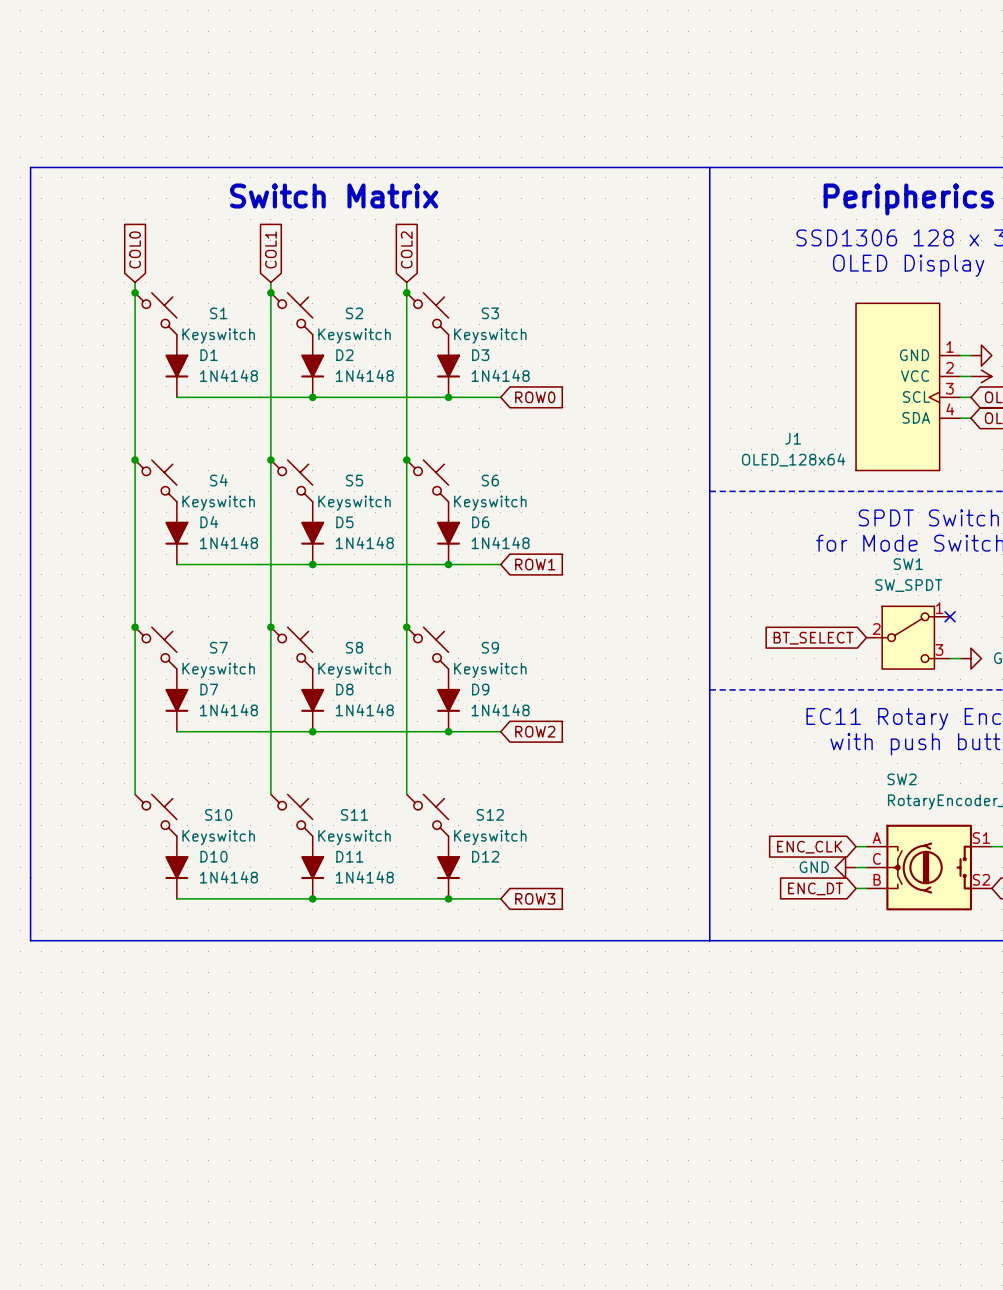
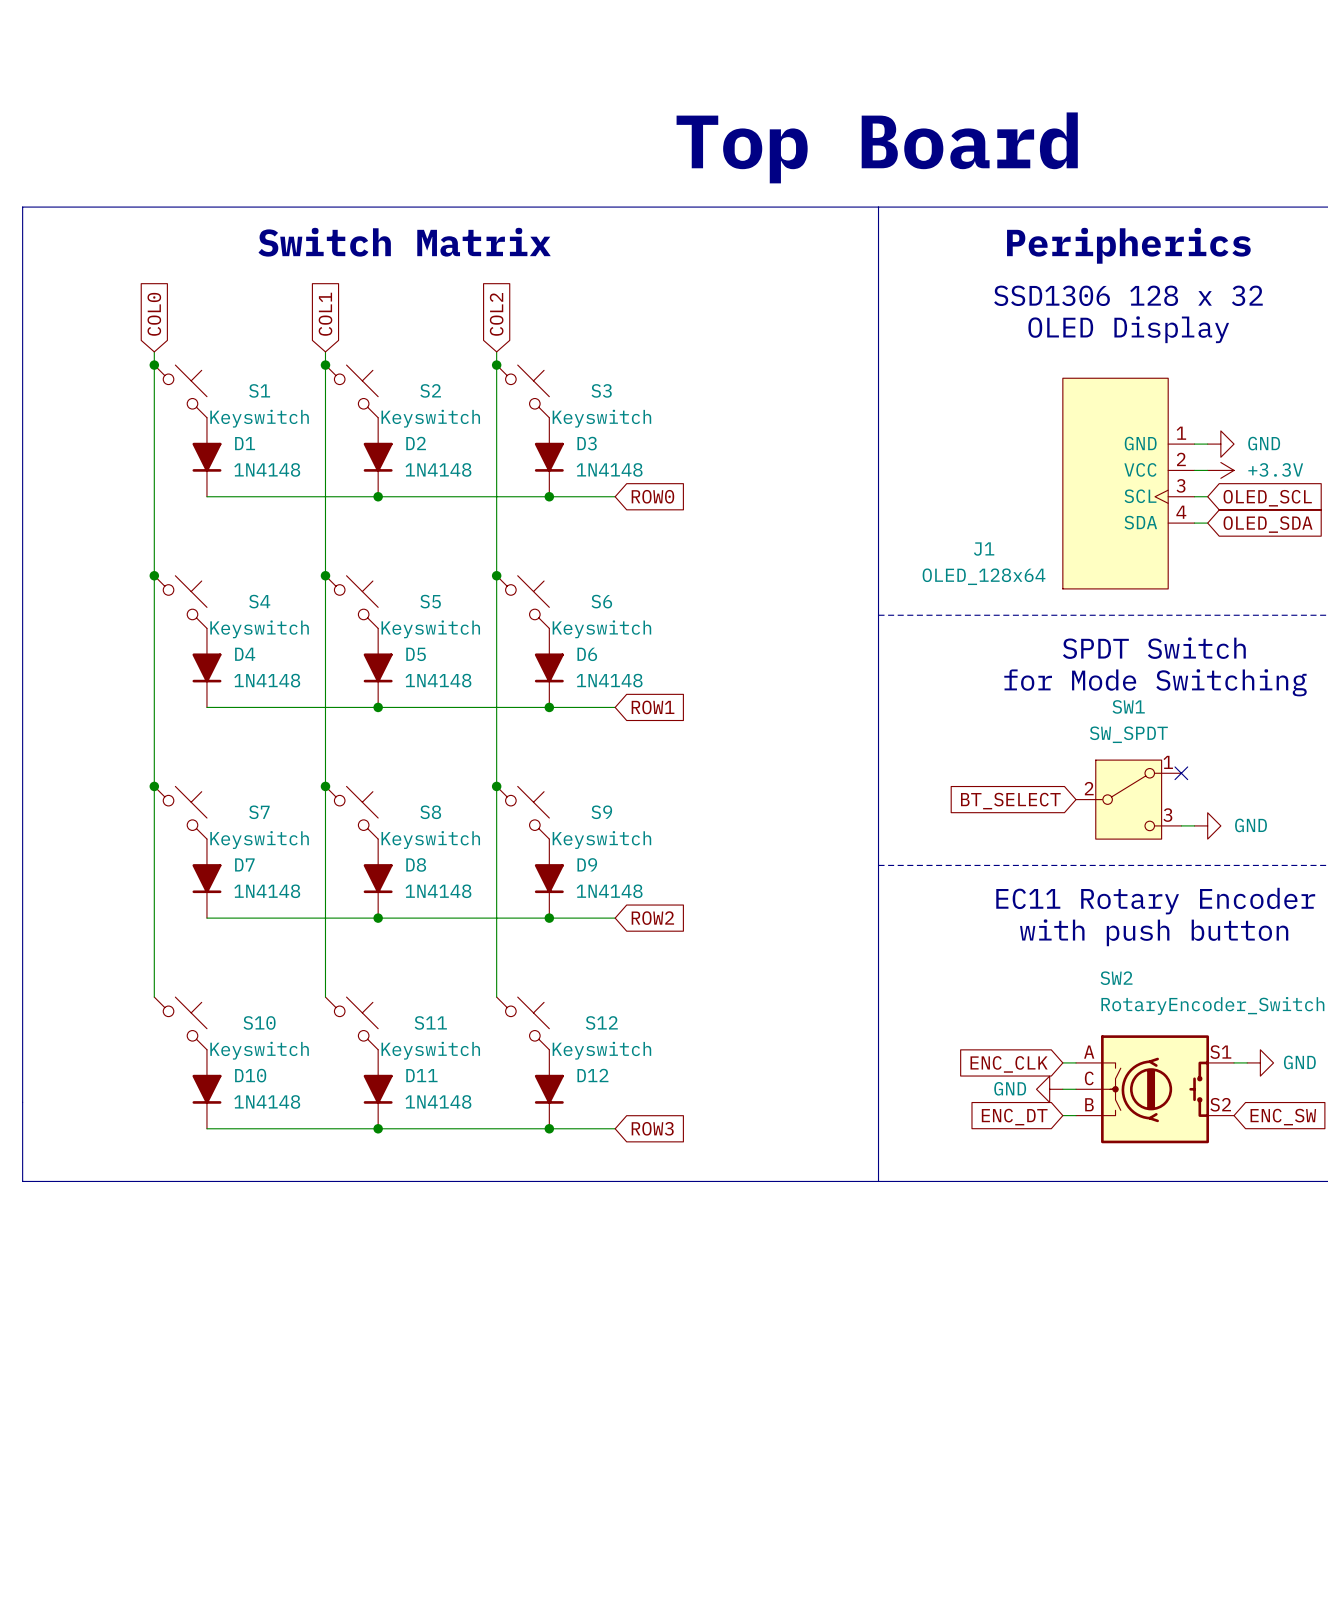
text: none -> Top Board (877, 147)

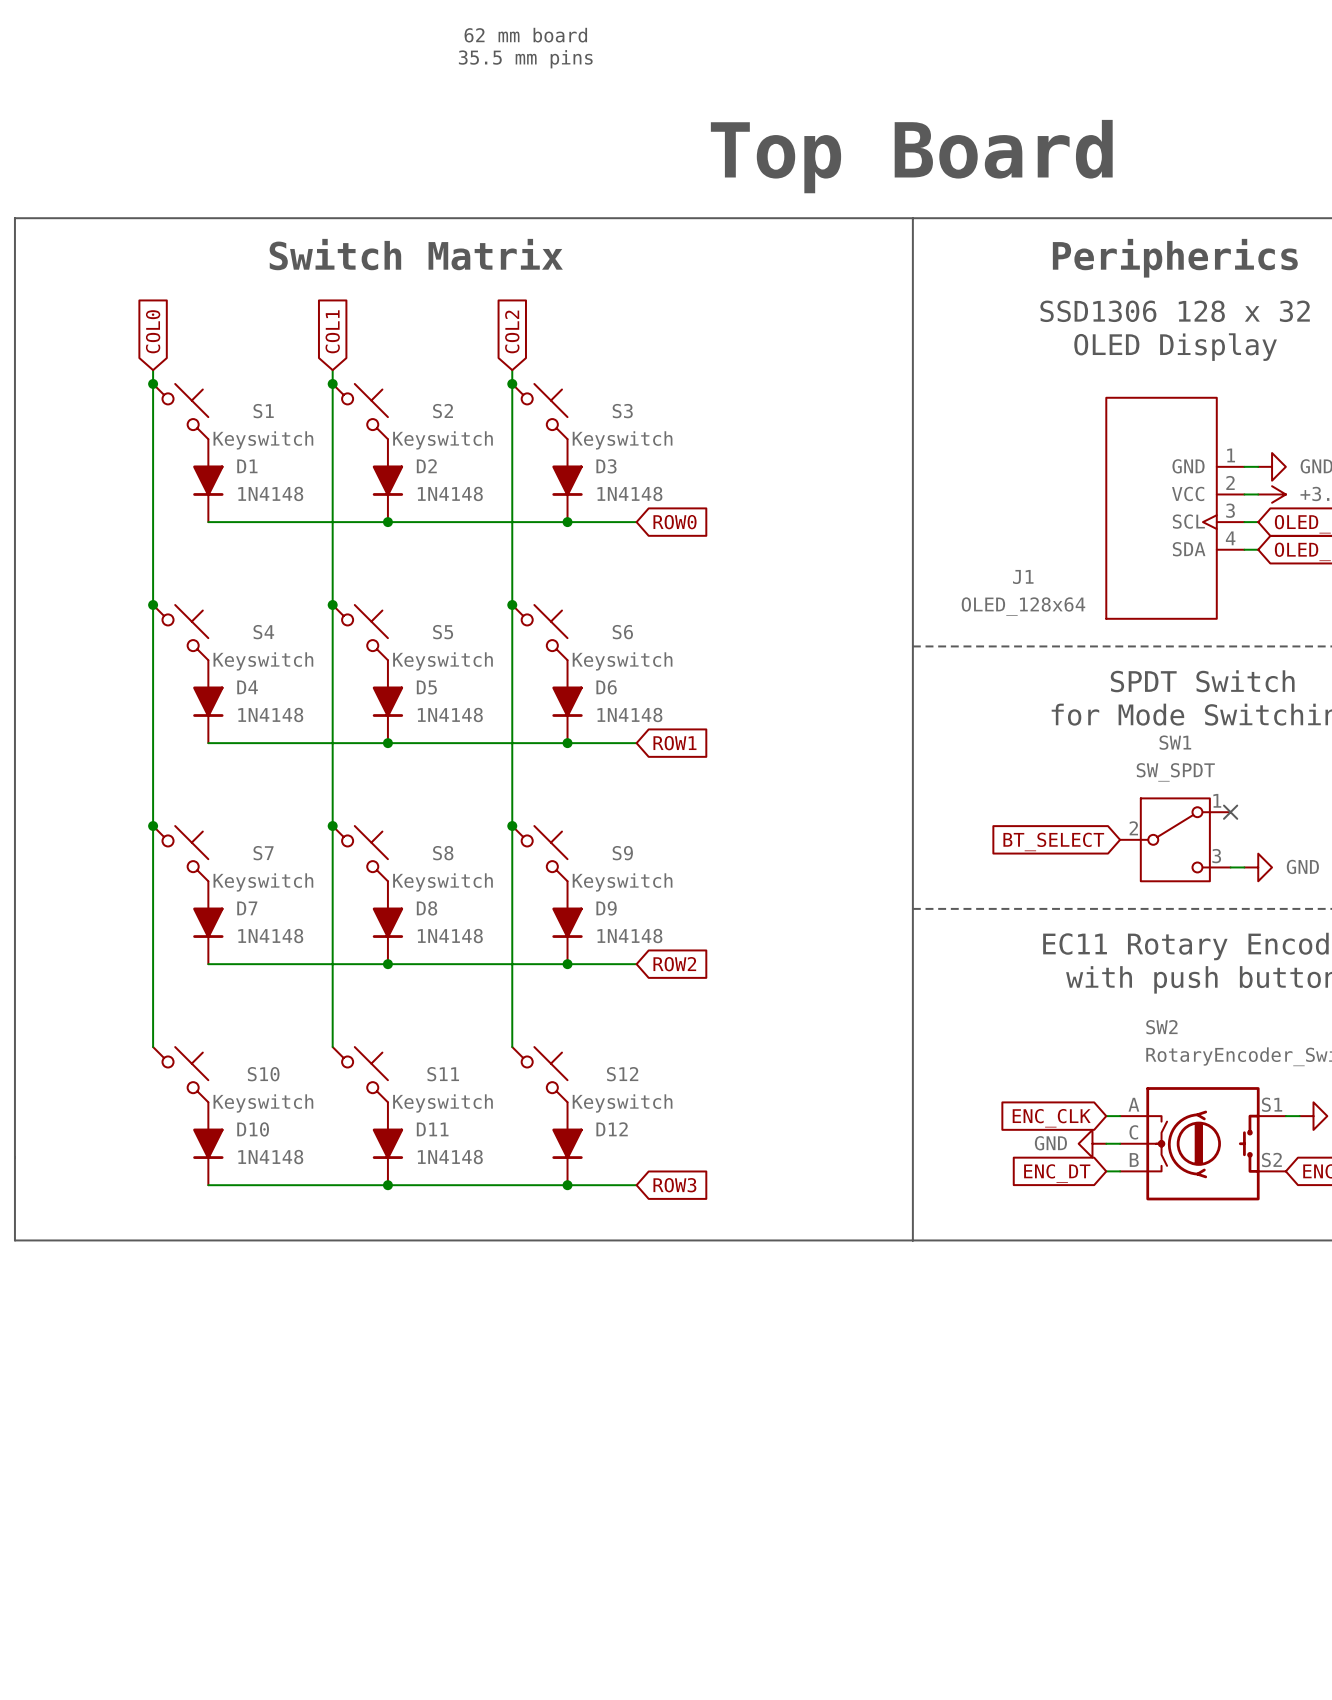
text: none -> 62 mm board (525, 35)
text: none -> 35.5 mm pins (525, 59)

